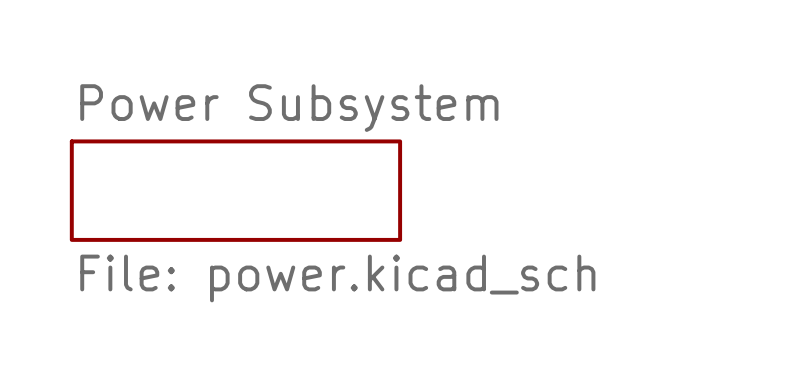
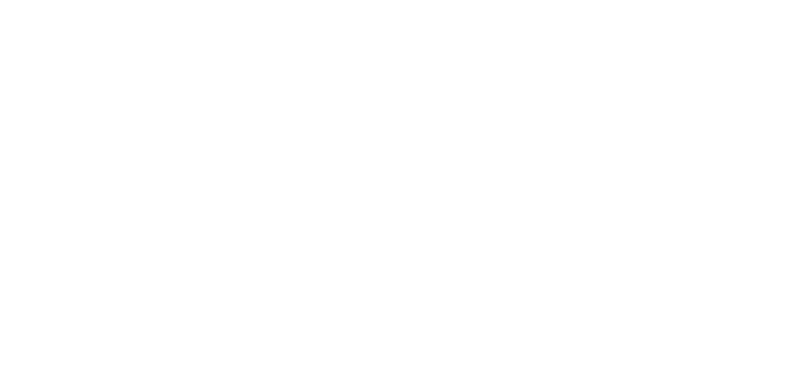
sheet Power Subsystem: File: power.kicad_sch (235, 190) -> none

